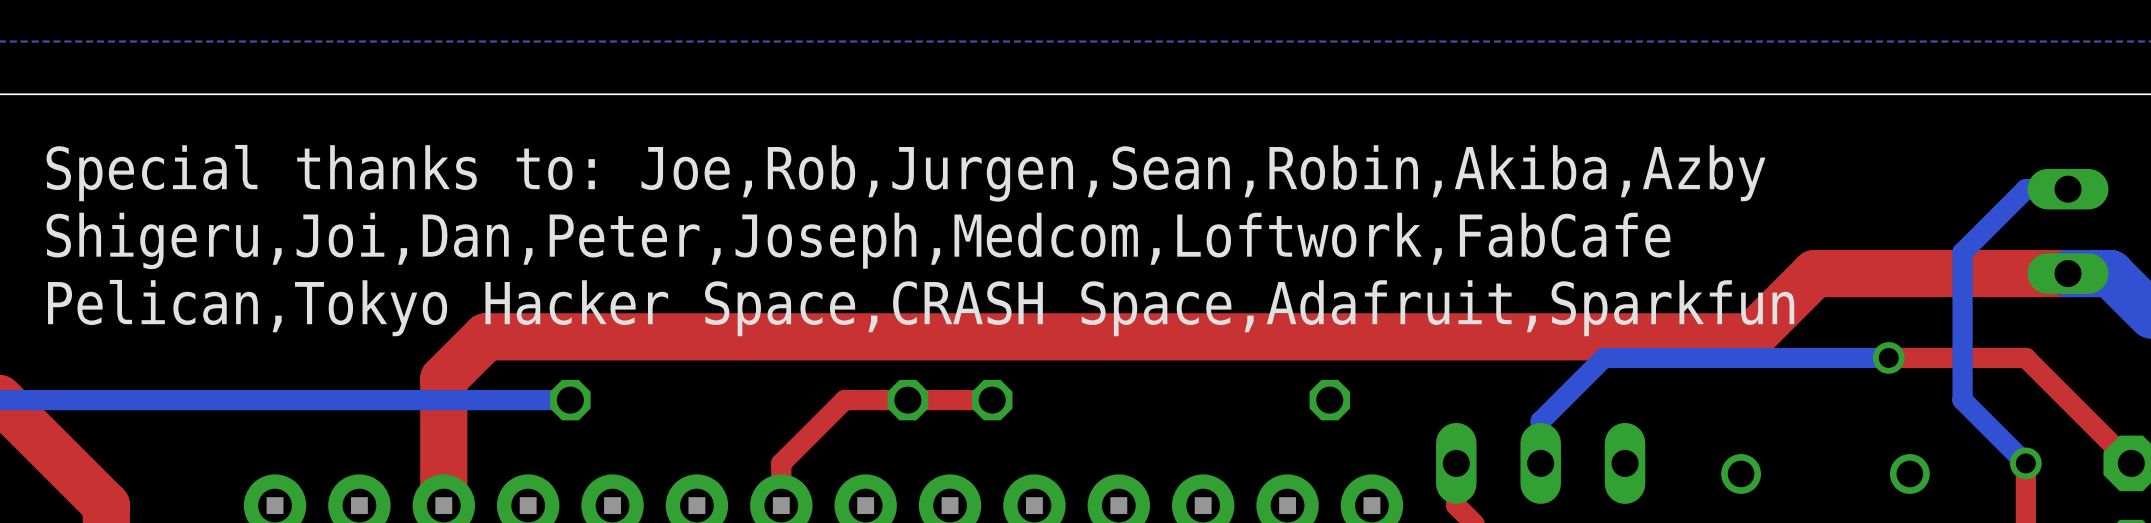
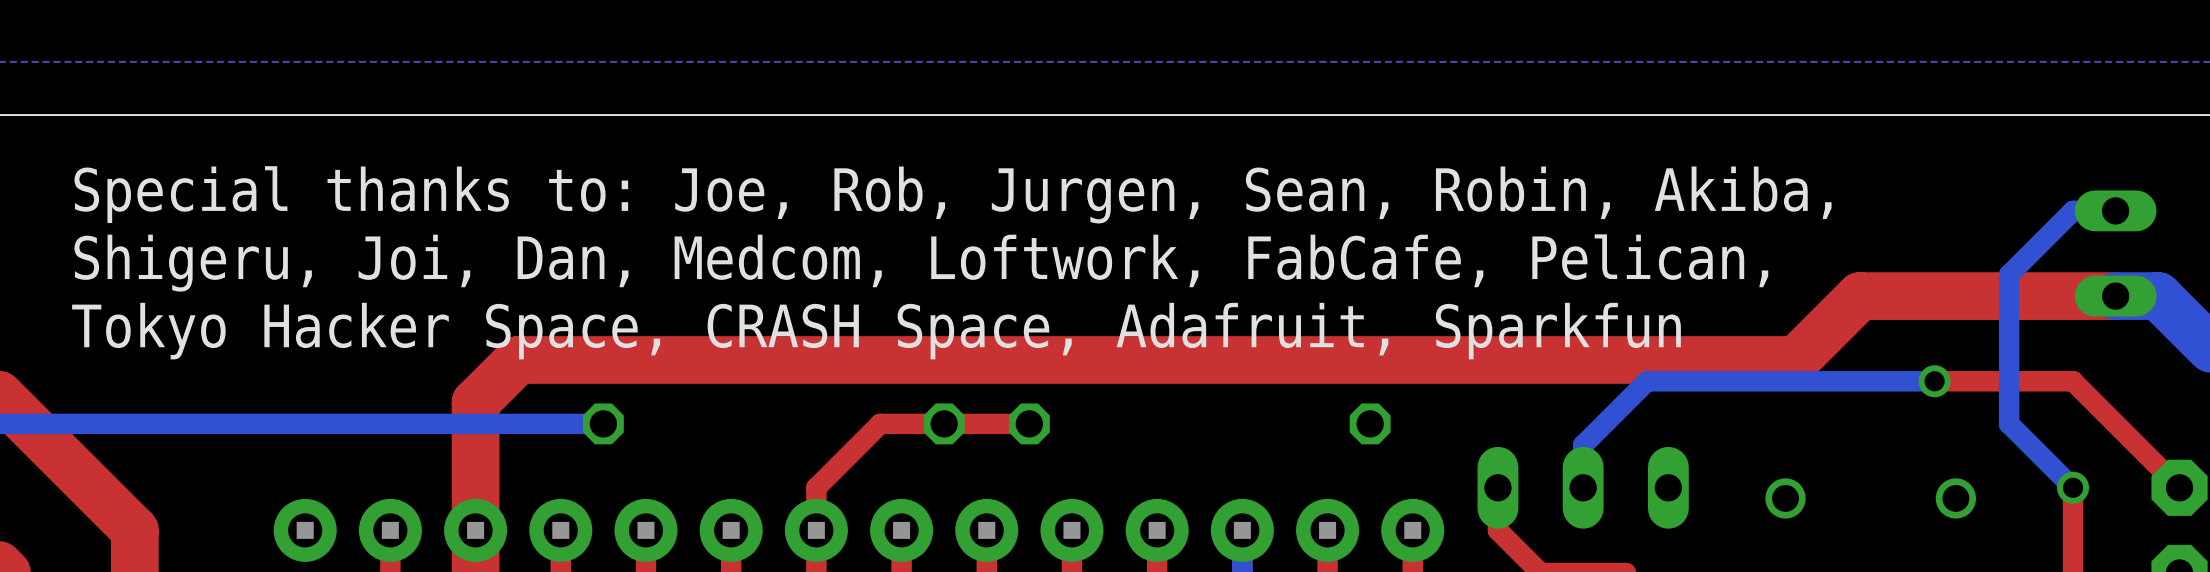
text: Special thanks to: Joe,Rob,Jurgen,Sean,Robin,Akiba,Azby (906, 173) -> Special thanks to: Joe, Rob, Jurgen, Sean, Robin, Akiba, (953, 194)
text: Shigeru,Joi,Dan,Peter,Joseph,Medcom,Loftwork,FabCafe (858, 240) -> Shigeru, Joi, Dan, Medcom, Loftwork, FabCafe, Pelican, (921, 262)
text: Pelican,Tokyo Hacker Space,CRASH Space,Adafruit,Sparkfun (921, 308) -> Tokyo Hacker Space, CRASH Space, Adafruit, Sparkfun (876, 331)

